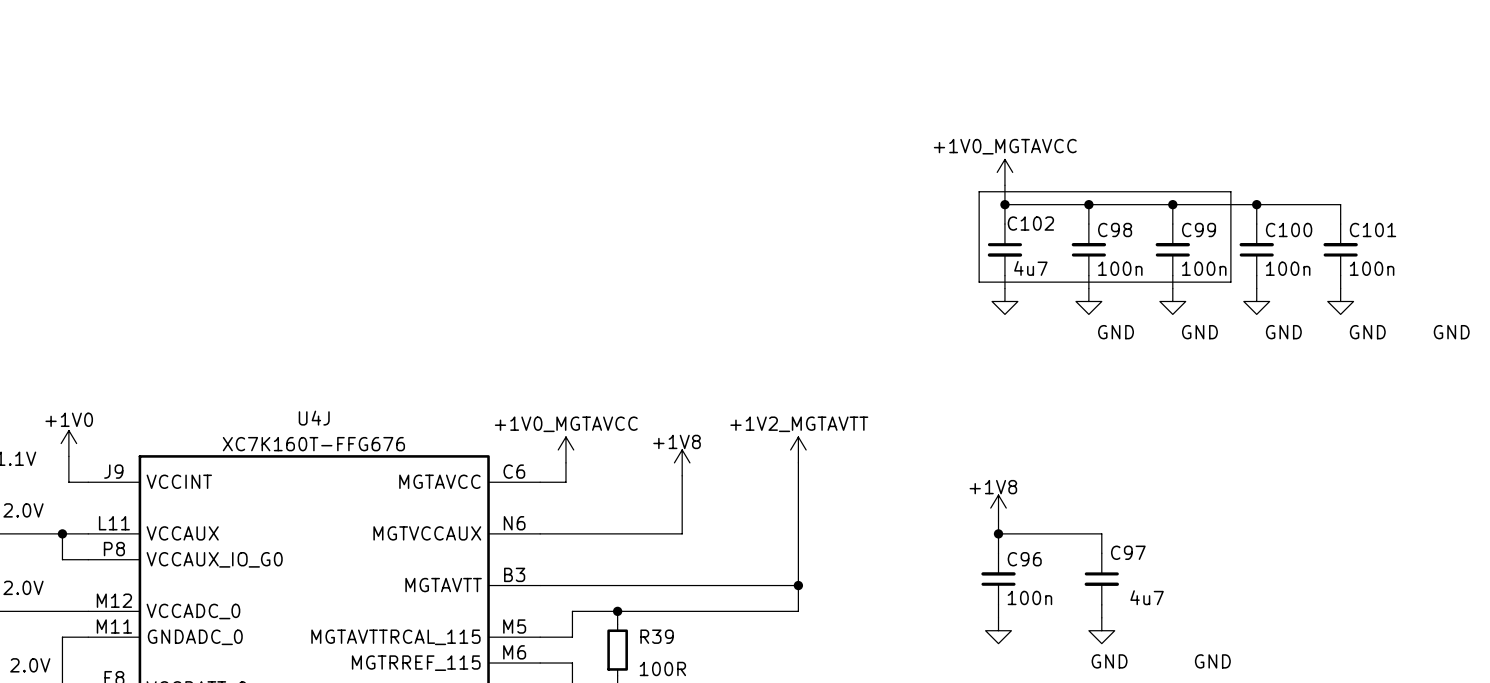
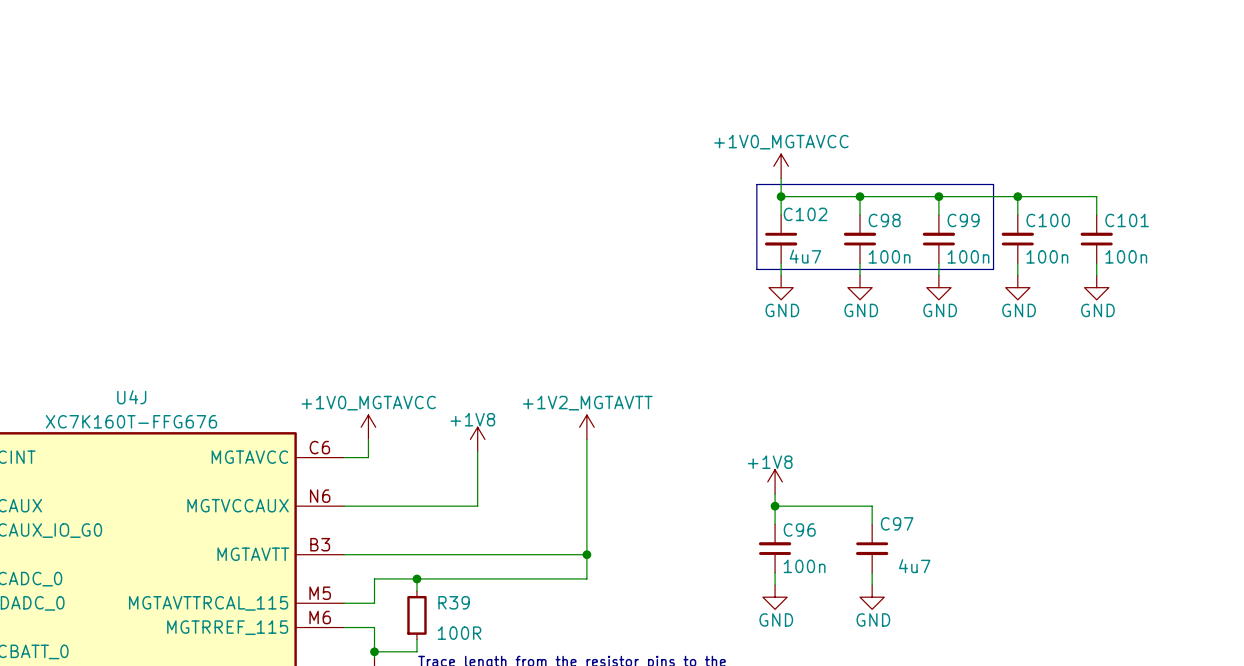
power symbol text position: GND (1116, 332) -> GND (782, 310)
power symbol text position: GND (1199, 332) -> GND (861, 310)
power symbol text position: GND (1283, 332) -> GND (940, 310)
power symbol text position: GND (1367, 332) -> GND (1019, 310)
power symbol text position: GND (1451, 332) -> GND (1097, 310)
power symbol text position: GND (1109, 661) -> GND (776, 619)
power symbol text position: GND (1212, 661) -> GND (873, 619)

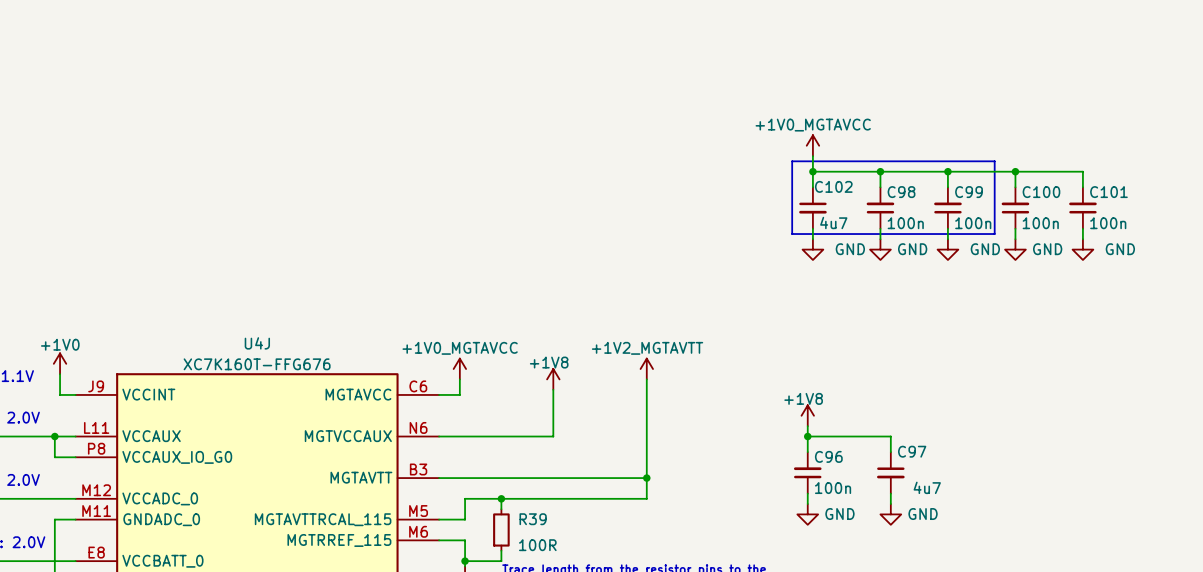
power symbol text position: GND (782, 310) -> GND (850, 249)
power symbol text position: GND (861, 310) -> GND (912, 249)
power symbol text position: GND (940, 310) -> GND (985, 249)
power symbol text position: GND (1019, 310) -> GND (1047, 249)
power symbol text position: GND (1097, 310) -> GND (1120, 249)
power symbol text position: GND (776, 619) -> GND (839, 514)
power symbol text position: GND (873, 619) -> GND (923, 514)

